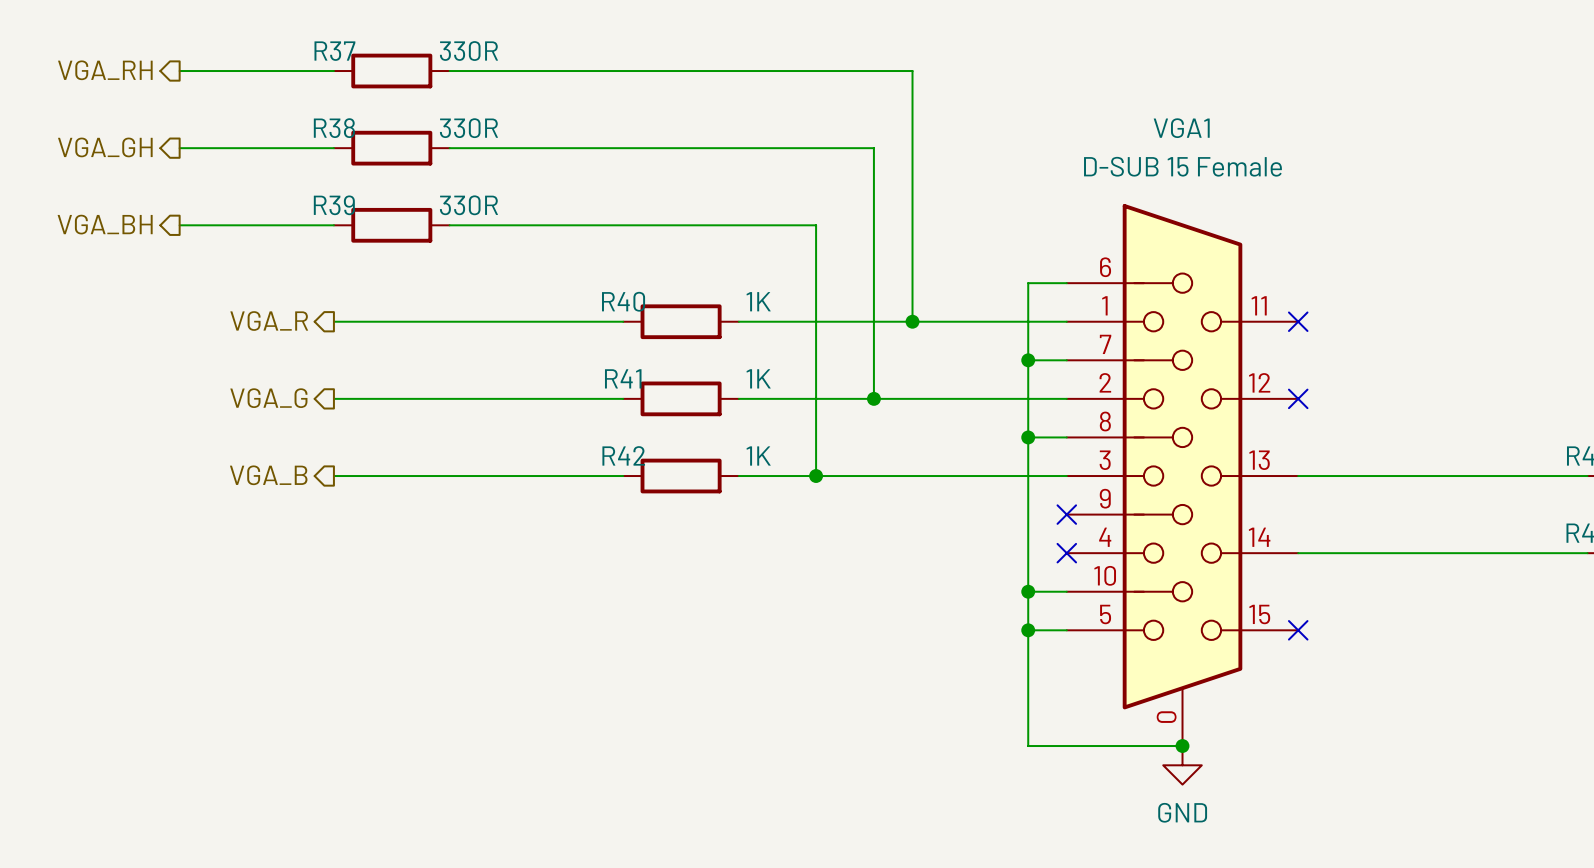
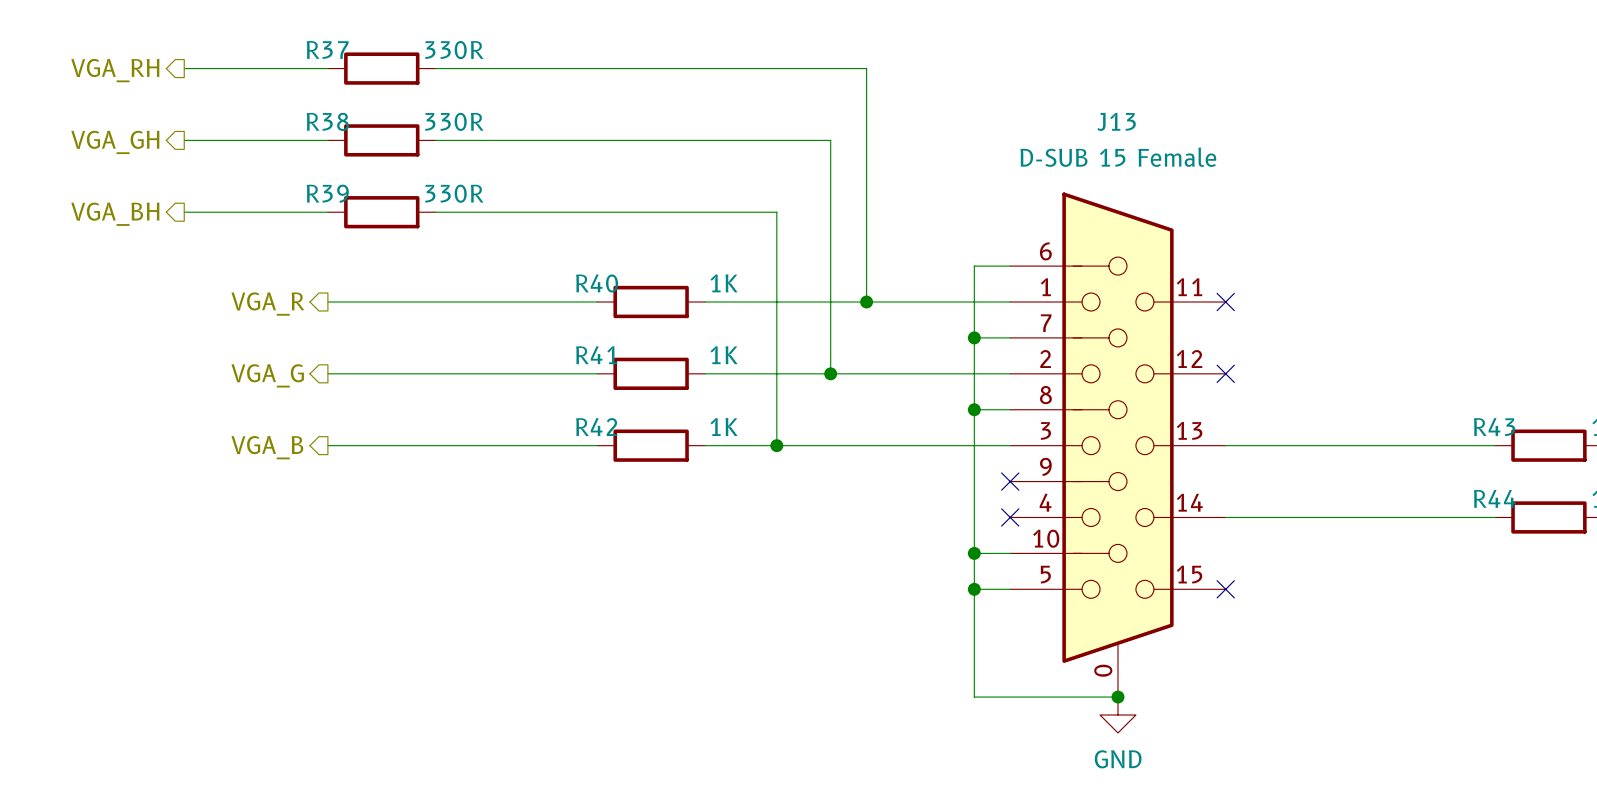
VGA1 name: VGA1 (1181, 128) -> J13 (1116, 121)

